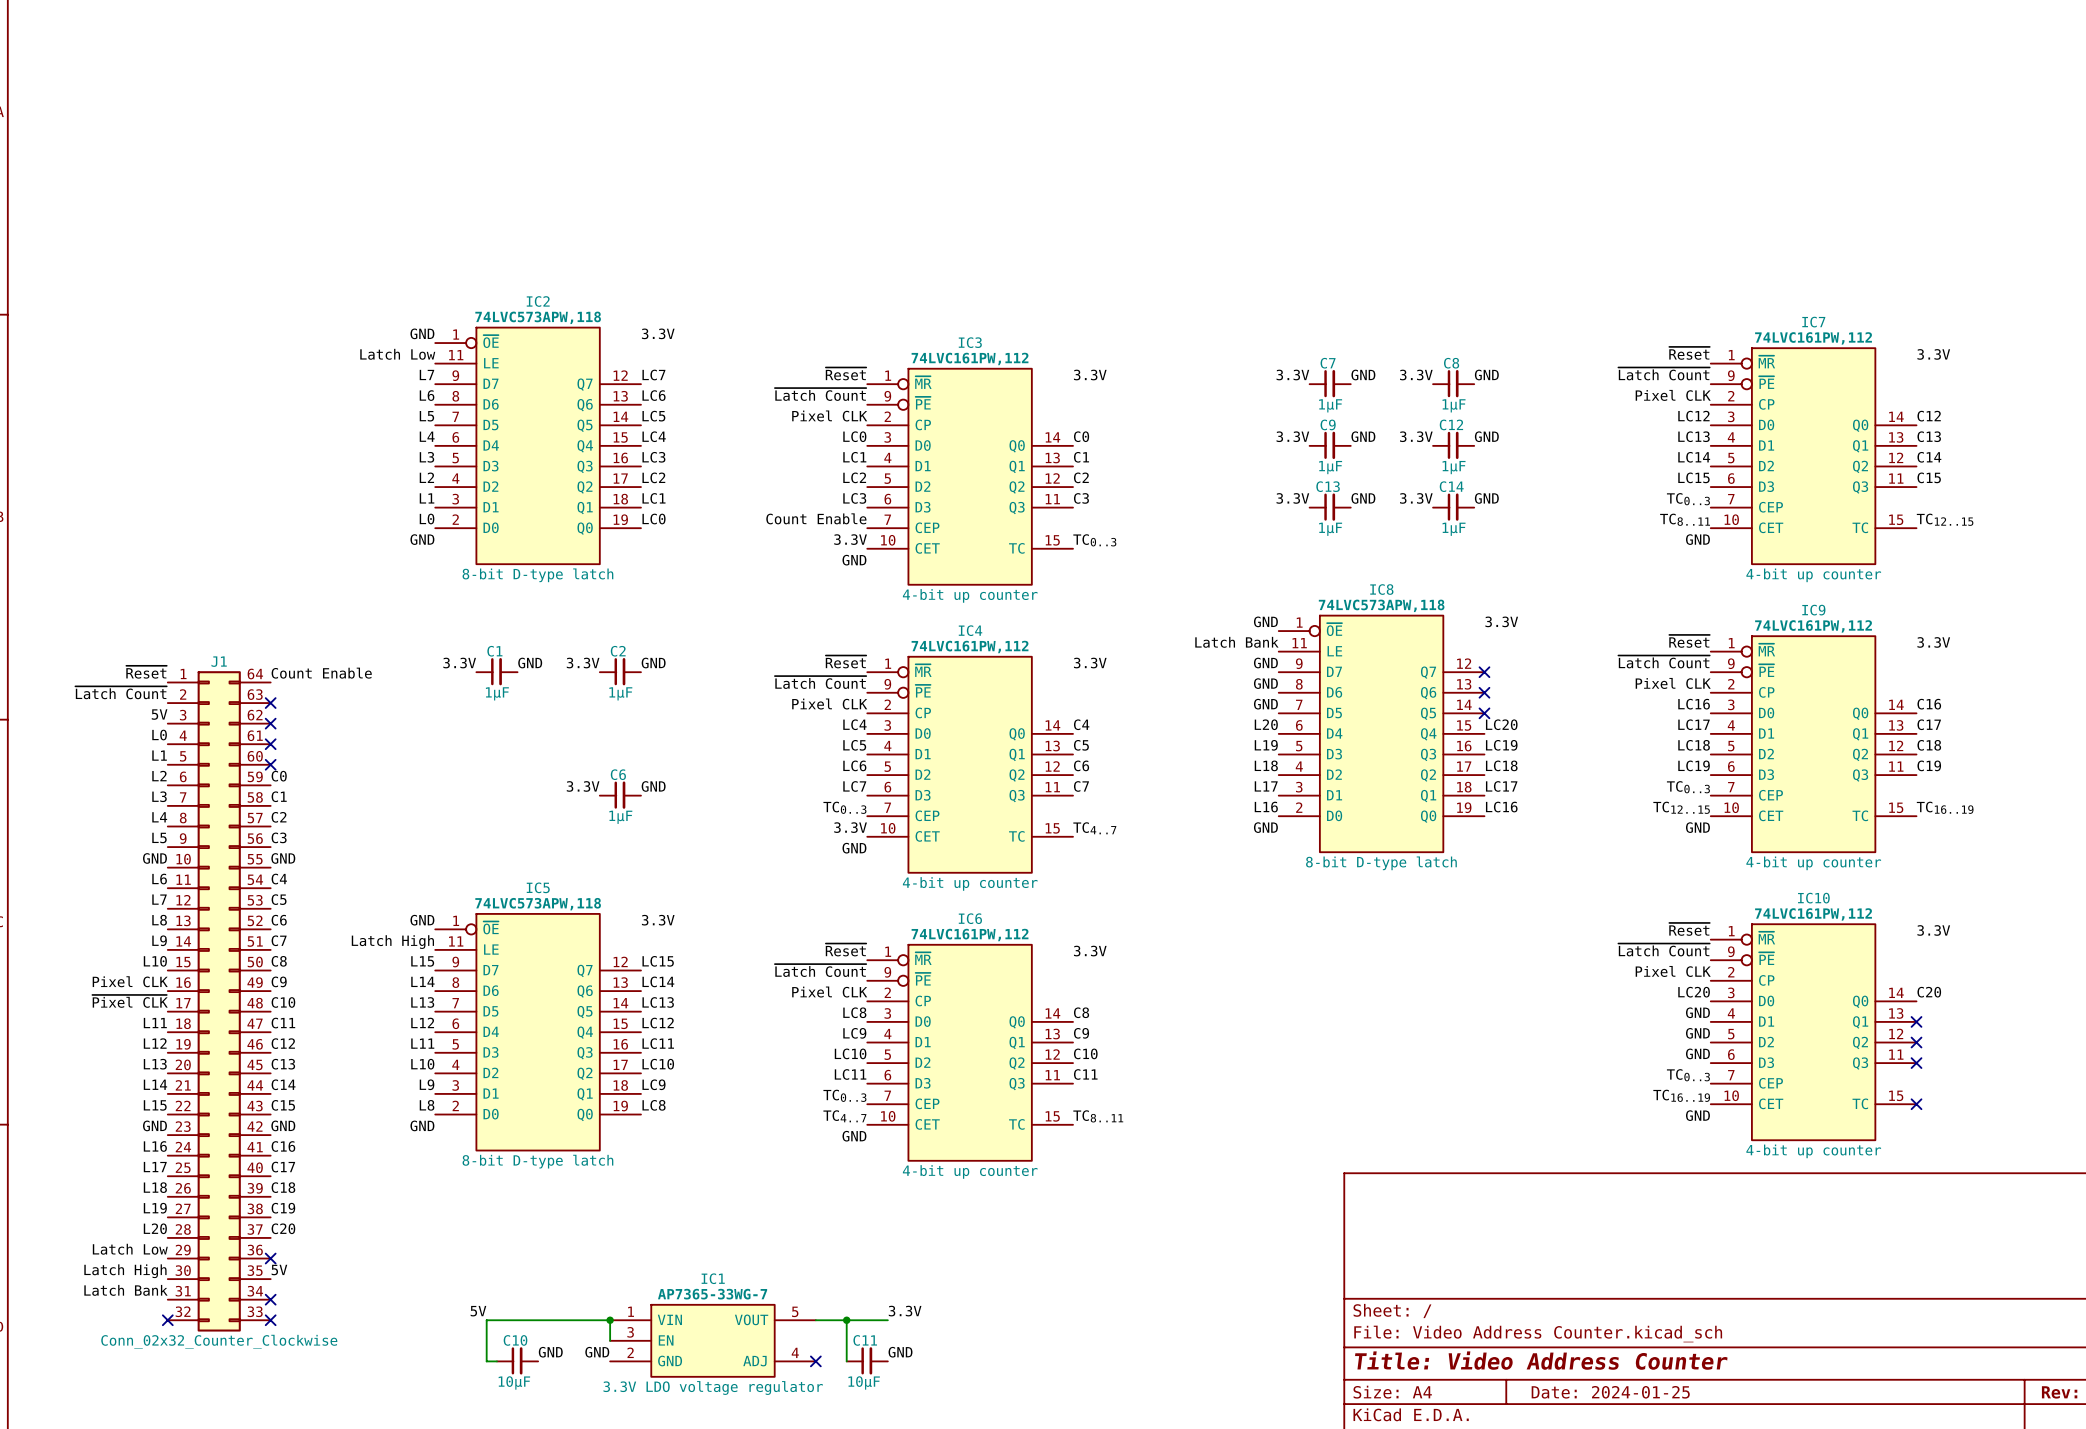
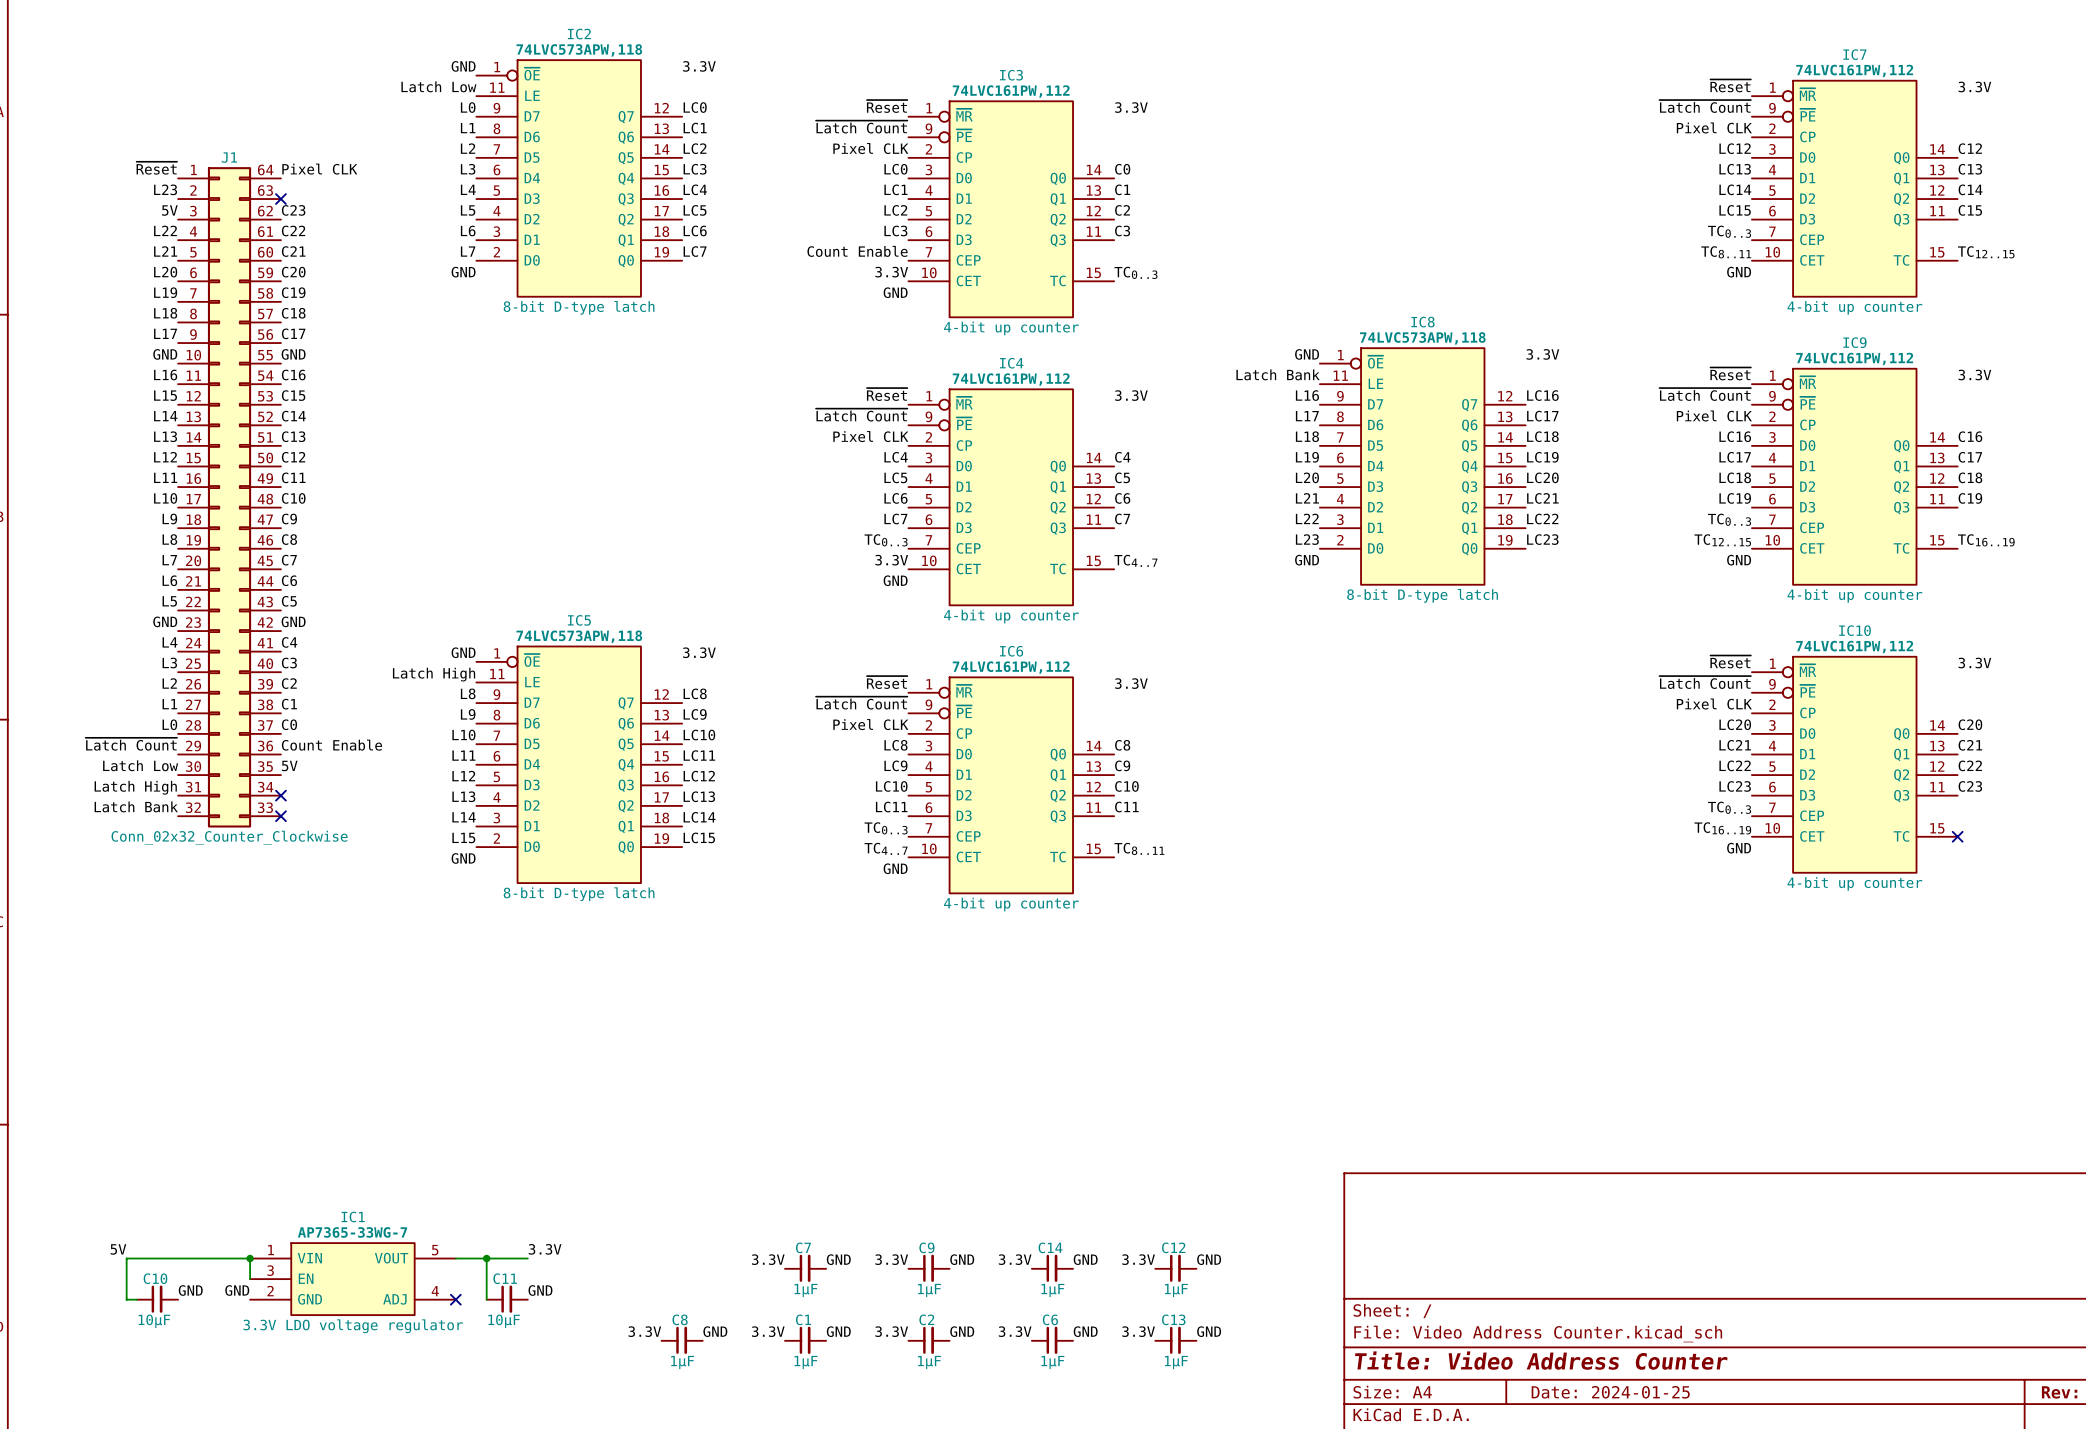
label: none -> GND (463, 66)
label: none -> 3.3V (699, 66)
label: none -> ~{Reset} (1730, 85)
label: none -> Latch Low (438, 86)
label: none -> 3.3V (1974, 86)
label: none -> ~{Reset} (887, 106)
label: none -> ~{Latch Count} (1705, 106)
label: none -> L0 (468, 107)
label: none -> LC0 (695, 107)
label: none -> 3.3V (1131, 107)
label: none -> ~{Latch Count} (861, 127)
label: none -> Pixel CLK (1714, 127)
label: none -> L1 (468, 128)
label: none -> LC1 (695, 128)
label: none -> L2 (468, 148)
label: none -> LC2 (695, 148)
label: none -> Pixel CLK (870, 148)
label: none -> LC12 (1735, 148)
label: none -> C12 (1970, 148)
label: none -> ~{Reset} (156, 168)
label: none -> Pixel CLK (319, 169)
label: none -> L3 (468, 169)
label: none -> LC3 (695, 169)
label: none -> LC0 (895, 169)
label: none -> C0 (1122, 169)
label: none -> LC13 (1735, 169)
label: none -> C13 (1970, 169)
label: none -> L23 (165, 189)
label: none -> L4 (468, 189)
label: none -> LC4 (695, 189)
label: none -> LC1 (895, 189)
label: none -> C1 (1122, 189)
label: none -> LC14 (1735, 189)
label: none -> C14 (1970, 189)
no-connect mark: none -> (280, 199)
label: none -> 5V (169, 210)
label: none -> C23 (293, 210)
label: none -> L5 (468, 210)
label: none -> LC5 (695, 210)
label: none -> LC2 (895, 210)
label: none -> C2 (1122, 210)
label: none -> LC15 (1735, 210)
label: none -> C15 (1970, 210)
label: none -> L22 (165, 230)
label: none -> C22 (293, 230)
label: none -> L6 (468, 230)
label: none -> LC6 (695, 230)
label: none -> LC3 (895, 230)
label: none -> C3 (1122, 230)
label: none -> TC0..3 (1729, 231)
label: none -> L21 (165, 251)
label: none -> C21 (293, 251)
label: none -> Count Enable (857, 251)
label: none -> TC8..11 (1726, 252)
label: none -> TC12..15 (1986, 252)
label: none -> L20 (165, 272)
label: none -> C20 (293, 272)
label: none -> 3.3V (891, 272)
label: none -> TC0..3 (1135, 272)
label: none -> GND (1739, 272)
label: none -> L19 (165, 292)
label: none -> C19 (293, 292)
label: none -> GND (895, 292)
label: none -> L18 (165, 313)
label: none -> C18 (293, 313)
label: none -> L17 (165, 333)
label: none -> C17 (293, 333)
label position: GND (422, 333) -> GND (463, 272)
label: 3.3V (658, 333) -> none
label position: ~{Reset} (1689, 353) -> ~{Reset} (1730, 373)
label: none -> GND (165, 354)
label: none -> GND (293, 354)
label: Latch Low (397, 354) -> none
label: none -> 3.3V (1542, 354)
label position: 3.3V (1933, 354) -> 3.3V (1974, 375)
label position: ~{Reset} (846, 373) -> ~{Reset} (887, 394)
label position: ~{Latch Count} (1664, 373) -> ~{Latch Count} (1705, 394)
label position: L7 (426, 374) -> L7 (468, 251)
label: none -> Latch Bank (1278, 374)
label: none -> L16 (165, 375)
label: none -> C16 (293, 375)
label position: LC7 (653, 375) -> LC7 (695, 251)
label position: 3.3V (1090, 375) -> 3.3V (1131, 395)
label: 3.3V (1292, 375) -> none
label position: GND (1363, 375) -> GND (1307, 354)
label: 3.3V (1416, 375) -> none
label: GND (1486, 375) -> none
C7 position: (1330, 383) -> (805, 1268)
C8 position: (1453, 383) -> (682, 1340)
label position: ~{Latch Count} (820, 394) -> ~{Latch Count} (861, 415)
label: none -> L15 (165, 395)
label: none -> C15 (293, 395)
label: L6 (427, 395) -> none
label: LC6 (654, 395) -> none
label: none -> L16 (1307, 395)
label: none -> LC16 (1542, 395)
label position: Pixel CLK (1673, 395) -> Pixel CLK (1714, 415)
label position: Pixel CLK (829, 415) -> Pixel CLK (870, 436)
label: none -> L14 (165, 416)
label: none -> C14 (293, 416)
label: L5 (426, 416) -> none
label: LC5 (653, 416) -> none
label: none -> L17 (1307, 416)
label: none -> LC17 (1542, 416)
label: LC12 (1693, 416) -> none
label: C12 (1929, 416) -> none
label: none -> L13 (165, 436)
label: none -> C13 (293, 436)
label: L4 (427, 436) -> none
label: LC4 (654, 436) -> none
label: LC0 (854, 436) -> none
label: C0 (1081, 436) -> none
label: 3.3V (1292, 436) -> none
label: none -> L18 (1307, 436)
label: GND (1363, 436) -> none
label: 3.3V (1416, 436) -> none
label: GND (1486, 436) -> none
label: none -> LC18 (1542, 436)
label: LC13 (1694, 436) -> none
label: none -> LC16 (1735, 436)
label: C13 (1929, 436) -> none
label: none -> C16 (1970, 436)
IC2 position: (538, 445) -> (579, 178)
C9 position: (1330, 445) -> (929, 1268)
C12 position: (1453, 445) -> (1175, 1268)
IC7 position: (1813, 456) -> (1854, 188)
label: none -> L12 (165, 457)
label: none -> C12 (293, 457)
label: L3 (426, 457) -> none
label: LC3 (653, 457) -> none
label: LC1 (854, 457) -> none
label: none -> LC4 (896, 457)
label: C1 (1081, 457) -> none
label: none -> C4 (1122, 457)
label: none -> L19 (1307, 457)
label: none -> LC19 (1542, 457)
label: LC14 (1694, 457) -> none
label: none -> LC17 (1735, 457)
label: C14 (1929, 457) -> none
label: none -> C17 (1970, 457)
IC3 position: (970, 476) -> (1011, 209)
label: none -> L11 (165, 477)
label: none -> C11 (293, 477)
label: L2 (426, 477) -> none
label: LC2 (653, 477) -> none
label: LC2 (854, 477) -> none
label: none -> LC5 (895, 477)
label: C2 (1081, 477) -> none
label: none -> C5 (1122, 477)
label: none -> L20 (1307, 477)
label: none -> LC20 (1542, 477)
label: LC15 (1693, 477) -> none
label: none -> LC18 (1735, 477)
label: C15 (1929, 477) -> none
label: none -> C18 (1970, 477)
label: none -> L10 (165, 498)
label: none -> C10 (293, 498)
label: L1 (427, 498) -> none
label: LC1 (653, 498) -> none
label: LC3 (854, 498) -> none
label: none -> LC6 (895, 498)
label: C3 (1081, 498) -> none
label: none -> C6 (1122, 498)
label: 3.3V (1292, 498) -> none
label: none -> L21 (1307, 498)
label: GND (1363, 498) -> none
label: 3.3V (1416, 498) -> none
label: GND (1486, 498) -> none
label: none -> LC21 (1542, 498)
label: none -> LC19 (1735, 498)
label: none -> C19 (1970, 498)
label position: TC0..3 (1688, 499) -> TC0..3 (1729, 519)
C13 position: (1330, 507) -> (1175, 1340)
C14 position: (1453, 507) -> (1052, 1268)
label: Count Enable (816, 518) -> none
label: none -> L22 (1307, 518)
label: none -> L9 (169, 519)
label: none -> C9 (289, 519)
label: L0 (427, 519) -> none
label: LC0 (654, 519) -> none
label: none -> LC7 (895, 519)
label: none -> C7 (1122, 519)
label: none -> LC22 (1542, 519)
label: TC8..11 (1685, 519) -> TC12..15 (1722, 540)
label: TC12..15 (1945, 519) -> TC16..19 (1986, 540)
label: none -> L8 (169, 539)
label: none -> C8 (289, 539)
label: GND (422, 539) -> none
label position: 3.3V (850, 539) -> 3.3V (891, 560)
label: none -> L23 (1307, 539)
label: none -> LC23 (1542, 539)
label position: GND (1697, 539) -> GND (1739, 560)
label: none -> TC0..3 (886, 540)
label: TC0..3 (1094, 540) -> TC4..7 (1135, 560)
label: none -> L7 (169, 560)
label: none -> C7 (289, 560)
label position: GND (854, 560) -> GND (895, 580)
label: none -> GND (1307, 560)
label: none -> L6 (169, 580)
label: none -> C6 (289, 580)
label: none -> L5 (169, 601)
label: none -> C5 (289, 601)
label: none -> GND (165, 621)
label: none -> GND (293, 621)
label: GND (1265, 621) -> none
label: 3.3V (1501, 621) -> none
label position: ~{Reset} (1689, 641) -> ~{Reset} (1730, 661)
label: none -> L4 (169, 642)
label: none -> C4 (289, 642)
label: Latch Bank (1236, 642) -> none
label position: 3.3V (1933, 642) -> 3.3V (1974, 663)
label: none -> 3.3V (699, 652)
label position: ~{Reset} (846, 661) -> ~{Reset} (887, 682)
label position: ~{Latch Count} (1664, 661) -> ~{Latch Count} (1705, 682)
label: 3.3V (459, 663) -> none
label position: GND (530, 663) -> GND (463, 652)
label: 3.3V (583, 663) -> none
label: GND (653, 663) -> none
label position: 3.3V (1090, 663) -> 3.3V (1131, 683)
label: GND (1265, 663) -> none
C1 position: (496, 671) -> (805, 1340)
C2 position: (620, 671) -> (929, 1340)
label: ~{Reset} (146, 672) -> none
no-connect mark: (1484, 672) -> none
label position: Count Enable (321, 673) -> Count Enable (331, 745)
label: none -> Latch High (434, 674)
label position: ~{Latch Count} (820, 682) -> ~{Latch Count} (861, 703)
label: GND (1265, 683) -> none
label position: Pixel CLK (1673, 683) -> Pixel CLK (1714, 704)
label position: ~{Latch Count} (121, 692) -> ~{Latch Count} (131, 744)
no-connect mark: (1484, 692) -> none
label: none -> L8 (468, 693)
label: none -> LC8 (695, 693)
no-connect mark: (270, 703) -> none
label position: Pixel CLK (829, 704) -> Pixel CLK (870, 724)
label: GND (1265, 704) -> none
label: LC16 (1694, 704) -> none
label: C16 (1929, 704) -> none
no-connect mark: (1484, 713) -> none
label position: 5V (159, 714) -> 5V (289, 765)
label: none -> L9 (468, 714)
label: none -> LC9 (695, 714)
no-connect mark: (270, 723) -> none
label: LC4 (854, 724) -> none
label: C4 (1081, 724) -> none
label: L20 (1266, 724) -> none
label: LC20 (1501, 724) -> none
label: LC17 (1694, 724) -> none
label: none -> LC20 (1735, 724)
label: C17 (1929, 724) -> none
label: none -> C20 (1970, 724)
IC8 position: (1381, 733) -> (1422, 466)
label position: L0 (159, 735) -> L0 (169, 724)
label: none -> L10 (463, 735)
label: none -> LC10 (699, 735)
no-connect mark: (270, 744) -> none
IC9 position: (1813, 744) -> (1854, 476)
label: LC5 (854, 745) -> none
label: none -> LC8 (895, 745)
label: C5 (1081, 745) -> none
label: none -> C8 (1122, 745)
label: L19 (1266, 745) -> none
label: LC19 (1501, 745) -> none
label: LC18 (1694, 745) -> none
label: none -> LC21 (1735, 745)
label: C18 (1929, 745) -> none
label: none -> C21 (1970, 745)
label position: L1 (159, 755) -> L1 (169, 704)
label: none -> L11 (463, 755)
label: none -> LC11 (699, 755)
no-connect mark: (270, 764) -> none
IC4 position: (970, 764) -> (1011, 497)
label: none -> Latch Low (140, 765)
label: LC6 (854, 765) -> none
label: none -> LC9 (895, 765)
label: C6 (1081, 765) -> none
label: none -> C9 (1122, 765)
label: L18 (1266, 765) -> none
label: LC18 (1501, 765) -> none
label: LC19 (1694, 765) -> none
label: none -> LC22 (1735, 765)
label: C19 (1929, 765) -> none
label: none -> C22 (1970, 765)
label position: L2 (159, 776) -> L2 (169, 683)
label position: C0 (279, 776) -> C0 (289, 724)
label: none -> L12 (463, 776)
label: none -> LC12 (699, 776)
label: 3.3V (583, 786) -> none
label: GND (653, 786) -> none
label: LC7 (854, 786) -> none
label: none -> LC10 (891, 786)
label: C7 (1081, 786) -> none
label: none -> C10 (1126, 786)
label: L17 (1266, 786) -> none
label: LC17 (1501, 786) -> none
label: none -> LC23 (1735, 786)
label: none -> C23 (1970, 786)
label: none -> Latch High (135, 787)
label position: TC0..3 (1688, 787) -> TC0..3 (1729, 807)
no-connect mark: none -> (280, 795)
C6 position: (620, 795) -> (1052, 1340)
label position: L3 (159, 796) -> L3 (169, 663)
label position: C1 (279, 796) -> C1 (289, 704)
label: none -> L13 (463, 796)
label: none -> LC13 (699, 796)
label: none -> Latch Bank (136, 806)
label position: TC0..3 (844, 807) -> TC0..3 (886, 828)
label: none -> LC11 (891, 807)
label: none -> C11 (1126, 807)
label: L16 (1266, 807) -> none
label: LC16 (1501, 807) -> none
label: TC12..15 (1681, 807) -> TC16..19 (1722, 828)
label: TC16..19 (1945, 807) -> none
no-connect mark: none -> (280, 816)
label: L4 (159, 817) -> none
label position: C2 (279, 817) -> C2 (289, 683)
label: 3.3V (850, 827) -> none
label: GND (1265, 827) -> none
label position: GND (1697, 827) -> GND (1739, 848)
label: TC4..7 (1094, 828) -> TC8..11 (1139, 848)
no-connect mark: none -> (1957, 836)
label: L5 (159, 837) -> none
label position: C3 (279, 837) -> C3 (289, 663)
label position: GND (854, 848) -> GND (895, 868)
label: none -> TC4..7 (886, 848)
label: GND (154, 858) -> none
label: GND (283, 858) -> none
label: L6 (159, 879) -> none
label: C4 (279, 879) -> none
label: L7 (159, 899) -> none
label: C5 (279, 899) -> none
label: L8 (159, 920) -> none
label: C6 (279, 920) -> none
label position: GND (422, 920) -> GND (463, 858)
label: 3.3V (658, 920) -> none
label: ~{Reset} (1689, 929) -> none
label: 3.3V (1933, 930) -> none
label: L9 (159, 940) -> none
label: C7 (279, 940) -> none
label: Latch High (392, 942) -> none
label: ~{Reset} (846, 949) -> none
label: ~{Latch Count} (1664, 949) -> none
label: 3.3V (1090, 951) -> none
label: L10 (155, 961) -> none
label: C8 (279, 961) -> none
label position: L15 (422, 961) -> L15 (463, 837)
label position: LC15 (658, 961) -> LC15 (699, 837)
label: ~{Latch Count} (820, 970) -> none
label: Pixel CLK (1673, 971) -> none
label: Pixel CLK (130, 981) -> none
label: C9 (279, 981) -> none
label position: L14 (422, 981) -> L14 (464, 817)
label position: LC14 (658, 981) -> LC14 (699, 817)
label: Pixel CLK (829, 992) -> none
label: LC20 (1694, 992) -> none
label: C20 (1929, 992) -> none
label: ~{Pixel CLK} (130, 1001) -> none
J1 position: (219, 1001) -> (229, 497)
label: C10 (283, 1002) -> none
label: L13 (422, 1002) -> none
label: LC13 (658, 1002) -> none
label: LC8 (854, 1012) -> none
label: C8 (1081, 1012) -> none
label: GND (1697, 1012) -> none
no-connect mark: (1916, 1021) -> none
label: L12 (422, 1022) -> none
label: L11 (155, 1023) -> none
label: C11 (283, 1023) -> none
label: LC12 (658, 1023) -> none
IC5 position: (538, 1032) -> (579, 764)
IC10 position: (1813, 1032) -> (1854, 764)
label: LC9 (854, 1033) -> none
label: C9 (1081, 1033) -> none
label: GND (1697, 1033) -> none
no-connect mark: (1916, 1042) -> none
label: L12 (155, 1043) -> none
label: C12 (283, 1043) -> none
label: L11 (422, 1043) -> none
label: LC11 (658, 1043) -> none
IC6 position: (970, 1052) -> (1011, 785)
label: LC10 (850, 1053) -> none
label: C10 (1085, 1053) -> none
label: GND (1697, 1053) -> none
no-connect mark: (1916, 1063) -> none
label: L13 (155, 1064) -> none
label: C13 (283, 1064) -> none
label: L10 (422, 1064) -> none
label: LC10 (658, 1064) -> none
label: LC11 (850, 1074) -> none
label: C11 (1085, 1074) -> none
label: TC0..3 (1688, 1075) -> none
label: L14 (155, 1084) -> none
label: C14 (283, 1084) -> none
label: L9 (427, 1084) -> none
label: LC9 (653, 1084) -> none
label: TC0..3 (844, 1095) -> none
label: TC16..19 (1681, 1095) -> none
no-connect mark: (1916, 1104) -> none
label: L15 (155, 1105) -> none
label: C15 (283, 1105) -> none
label: L8 (427, 1105) -> none
label: LC8 (654, 1105) -> none
label: GND (1697, 1115) -> none
label: TC4..7 (844, 1116) -> none
label: TC8..11 (1098, 1116) -> none
label: GND (154, 1125) -> none
label: GND (283, 1125) -> none
label: GND (422, 1125) -> none
label: GND (854, 1136) -> none
label: L16 (155, 1146) -> none
label: C16 (283, 1146) -> none
label: L17 (155, 1167) -> none
label: C17 (283, 1167) -> none
label: L18 (155, 1187) -> none
label: C18 (283, 1187) -> none
label: L19 (155, 1208) -> none
label: C19 (283, 1208) -> none
label: L20 (155, 1228) -> none
label: C20 (283, 1228) -> none
label: Latch Low (130, 1249) -> none
label: none -> 3.3V (545, 1249)
junction: none -> (250, 1258)
no-connect mark: (270, 1258) -> none
wire: none -> (455, 1258) (527, 1258)
wire: none -> (486, 1258) (486, 1299)
junction: none -> (486, 1258)
label: none -> 3.3V (768, 1259)
label: none -> GND (838, 1259)
label: none -> 3.3V (891, 1259)
label: none -> GND (962, 1259)
label: none -> 3.3V (1015, 1259)
label: none -> GND (1085, 1259)
label: none -> 3.3V (1138, 1259)
label: none -> GND (1209, 1259)
label position: 5V (279, 1270) -> 5V (118, 1249)
label: Latch High (125, 1271) -> none
wire: none -> (250, 1279) (250, 1258) (126, 1258) (126, 1299) (136, 1299)
label: Latch Bank (125, 1290) -> none
label: none -> GND (190, 1290)
label: none -> GND (237, 1290)
label: none -> GND (540, 1290)
no-connect mark: (270, 1299) -> none
no-connect mark: none -> (455, 1299)
label: 5V (478, 1311) -> none
label position: 3.3V (905, 1311) -> 3.3V (891, 1331)
no-connect mark: (167, 1320) -> none
no-connect mark: (270, 1320) -> none
junction: (610, 1320) -> none
wire: (815, 1320) (887, 1320) -> none
wire: (846, 1320) (846, 1361) -> none
junction: (846, 1320) -> none
label: none -> 3.3V (644, 1331)
label: none -> GND (715, 1331)
label: none -> 3.3V (768, 1331)
label: none -> GND (838, 1331)
label: none -> GND (962, 1331)
label: none -> 3.3V (1015, 1331)
label: none -> GND (1085, 1331)
label: none -> 3.3V (1138, 1331)
label: none -> GND (1209, 1331)
wire: (610, 1340) (610, 1320) (486, 1320) (486, 1361) (496, 1361) -> none
IC1 position: (712, 1340) -> (352, 1279)
label: GND (550, 1352) -> none
label: GND (597, 1352) -> none
label: GND (900, 1352) -> none
C10 position: (517, 1360) -> (157, 1299)
C11 position: (867, 1360) -> (507, 1299)
no-connect mark: (815, 1361) -> none

